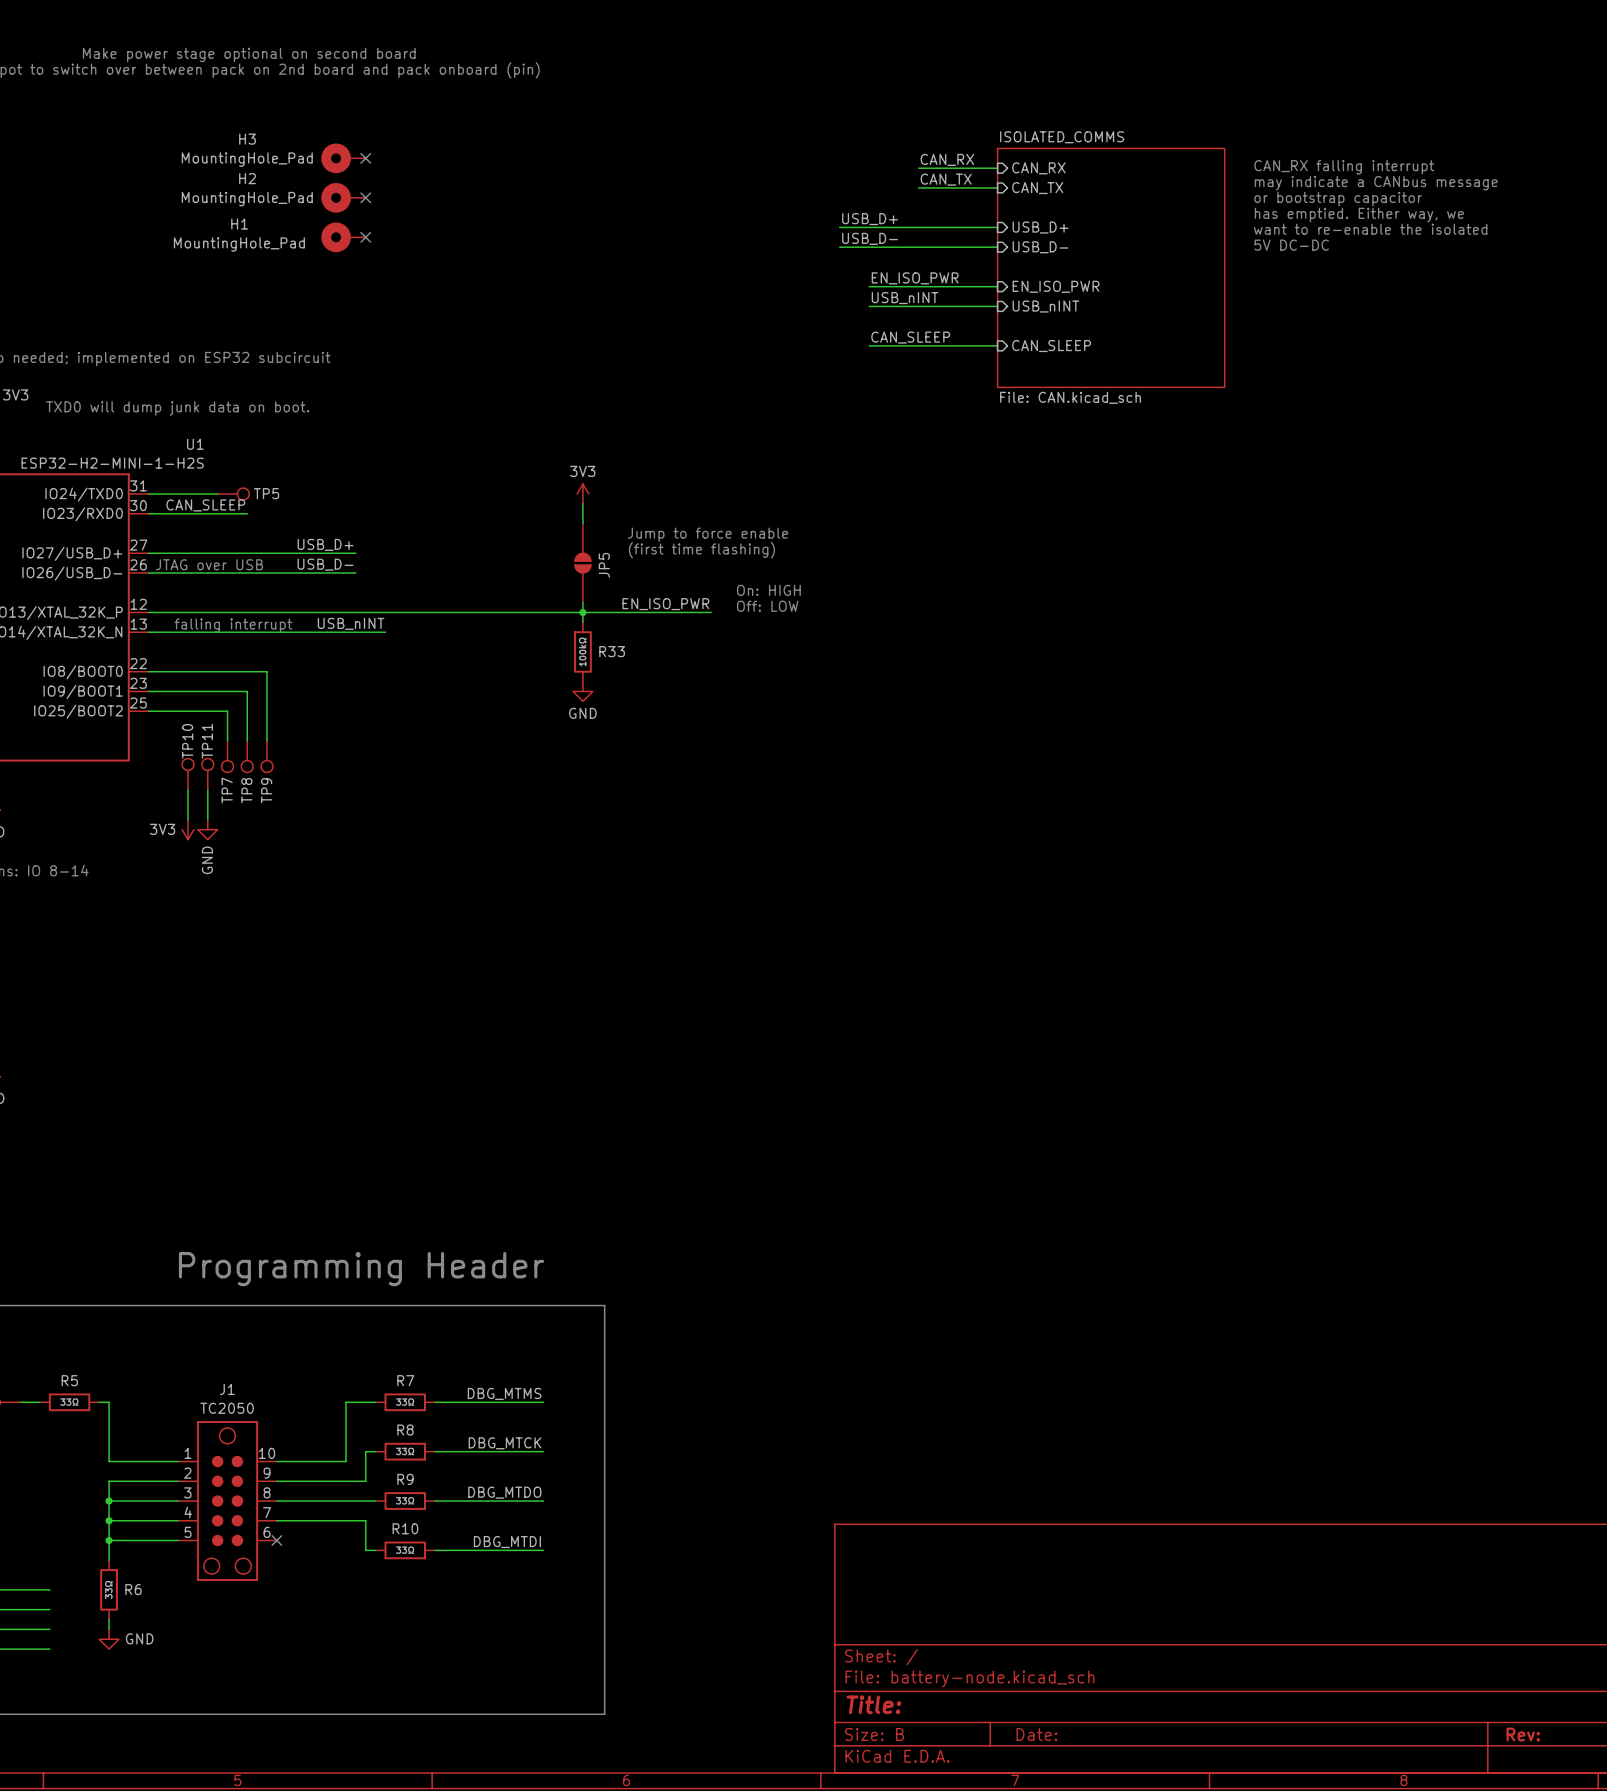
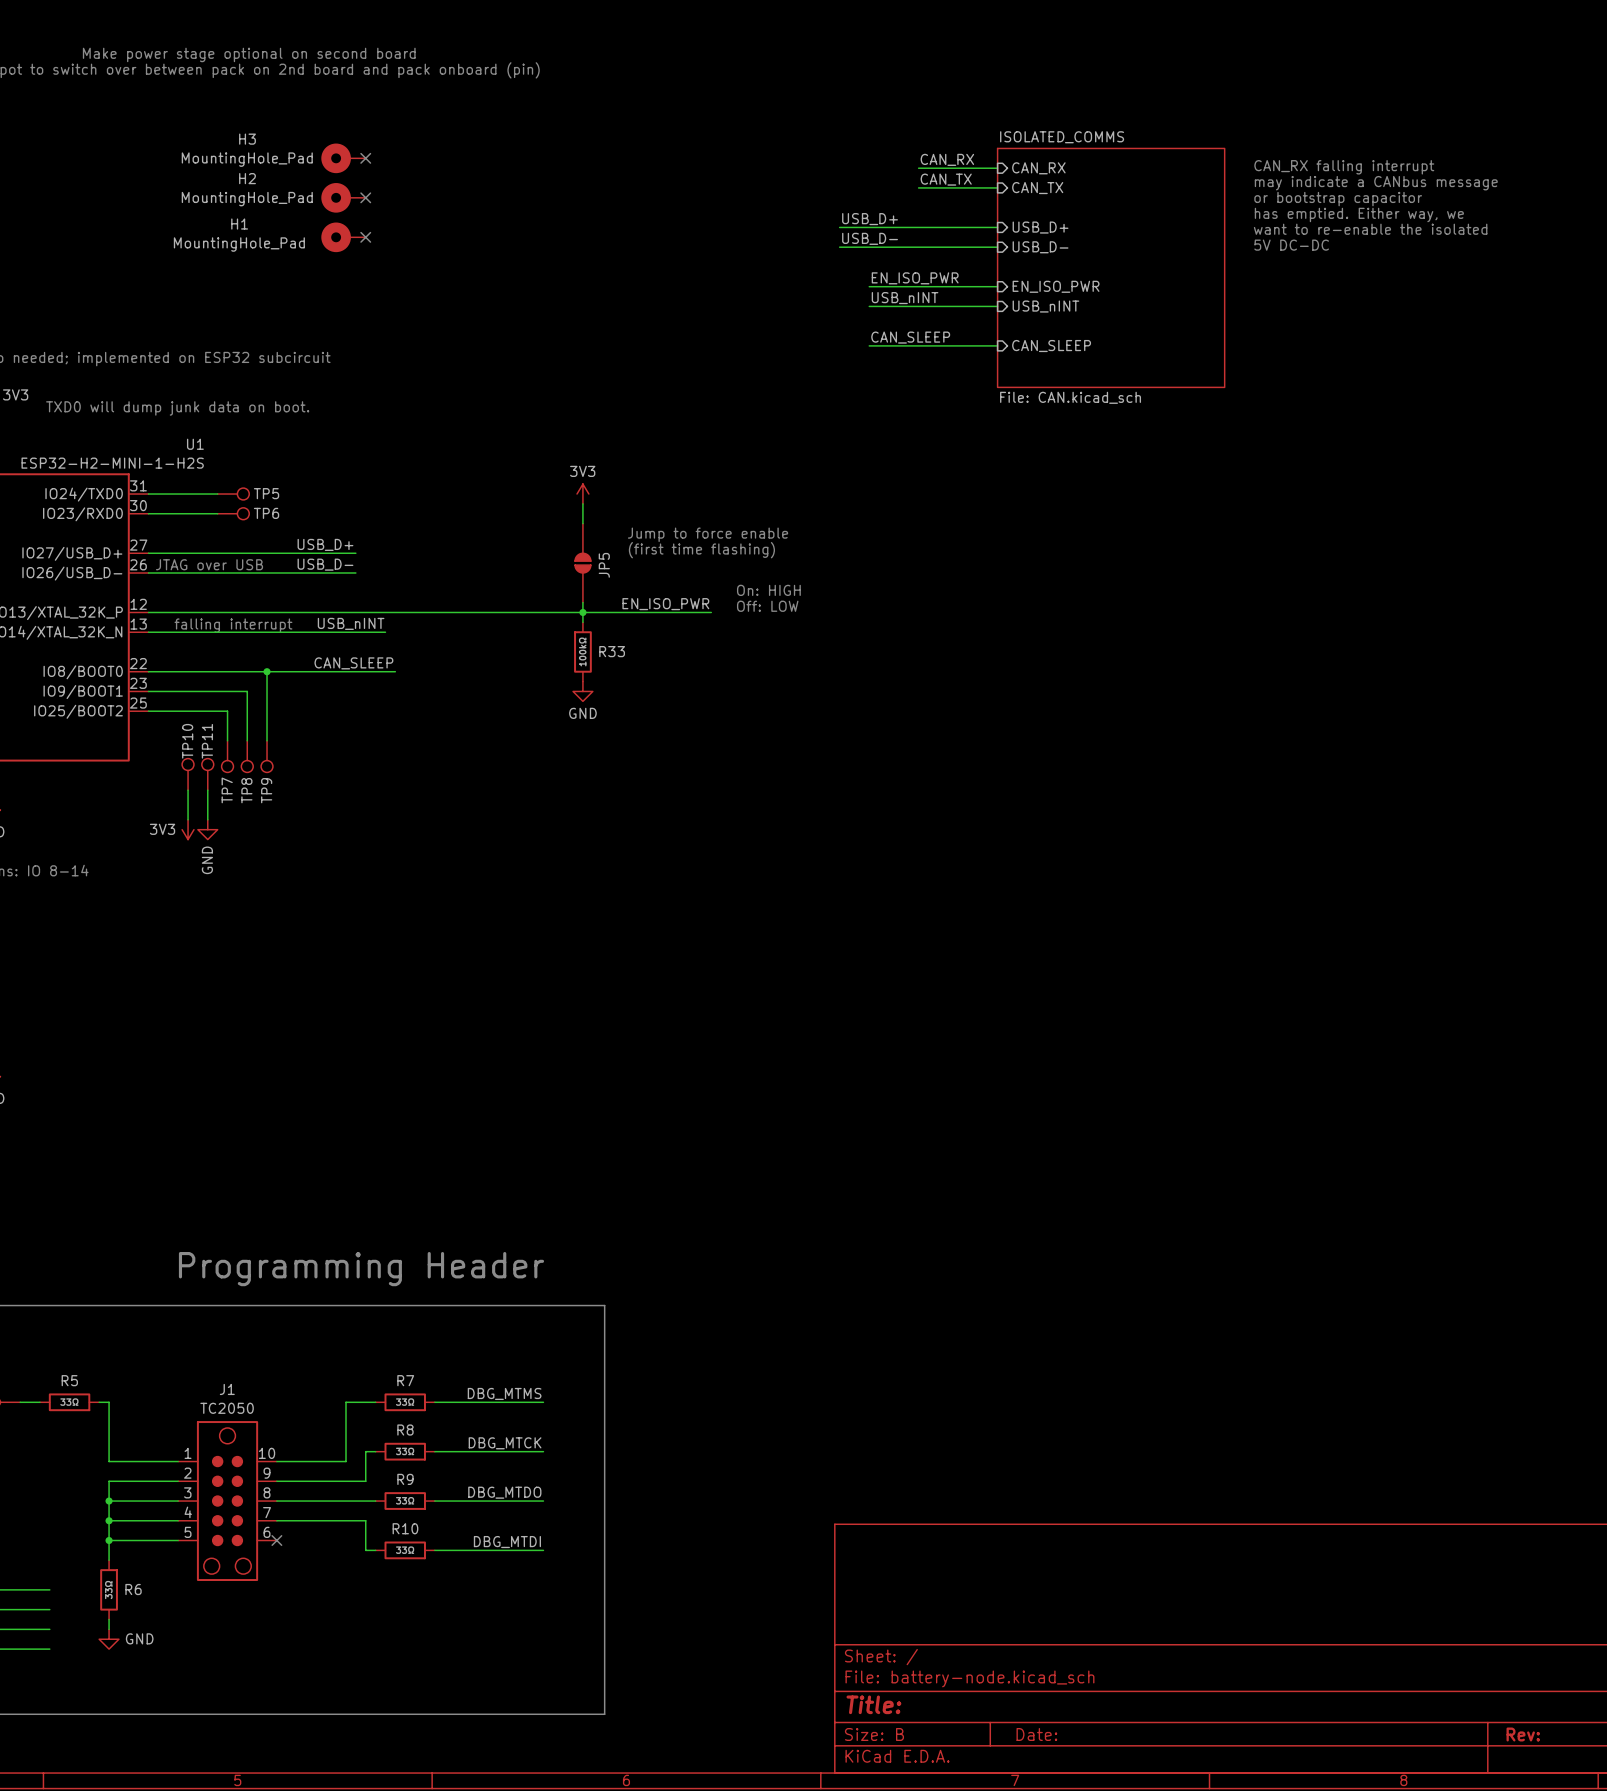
label: CAN_SLEEP (205, 505) -> none
TP6: none -> (233, 513)
label: none -> CAN_SLEEP (353, 663)
wire: none -> (267, 671) (395, 671)
junction: none -> (267, 671)

